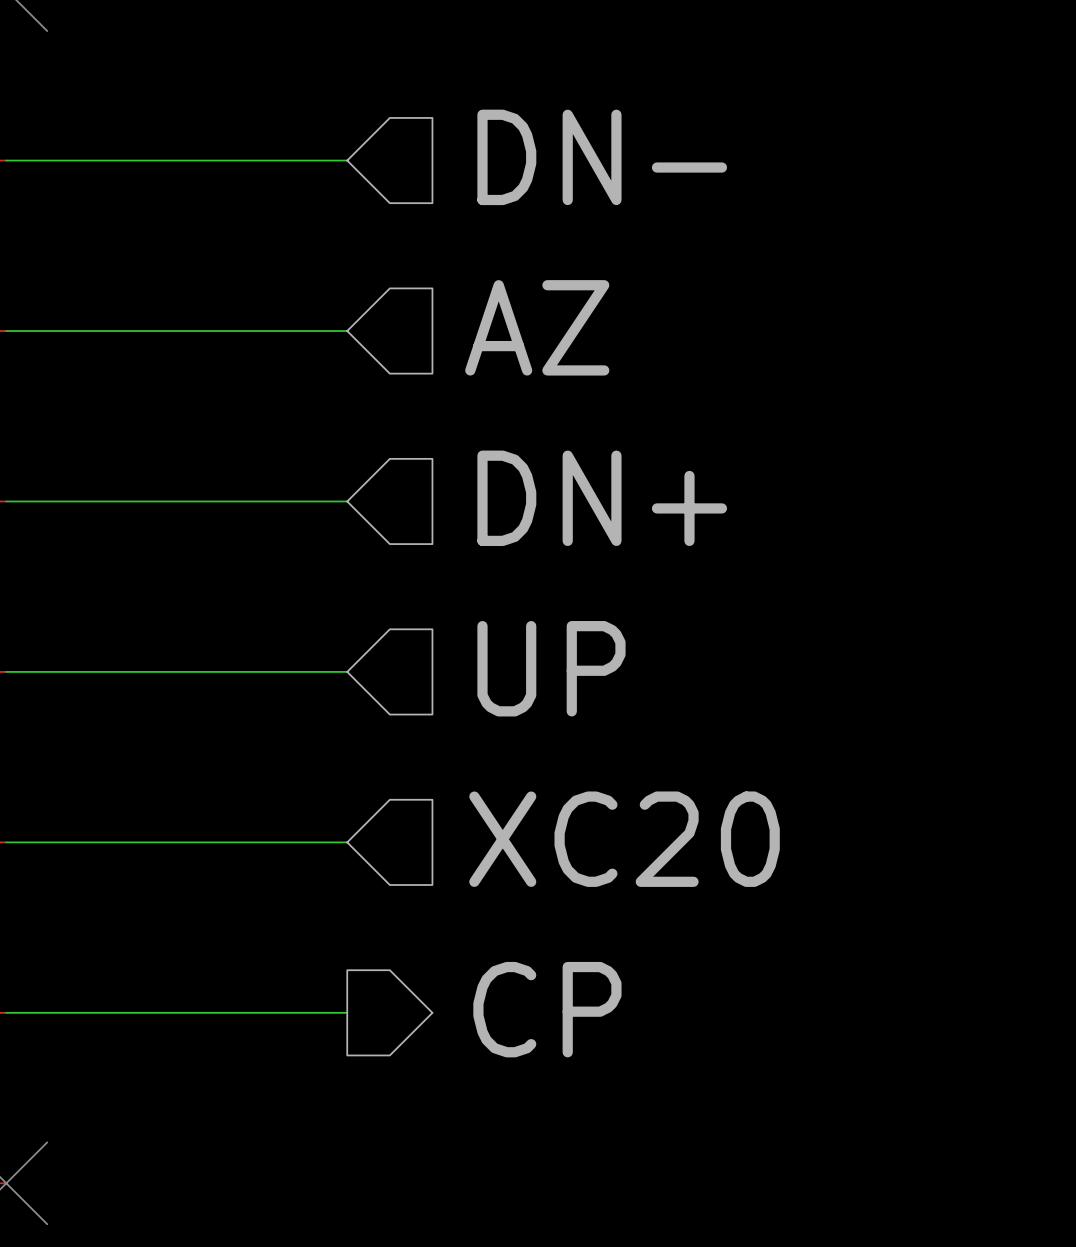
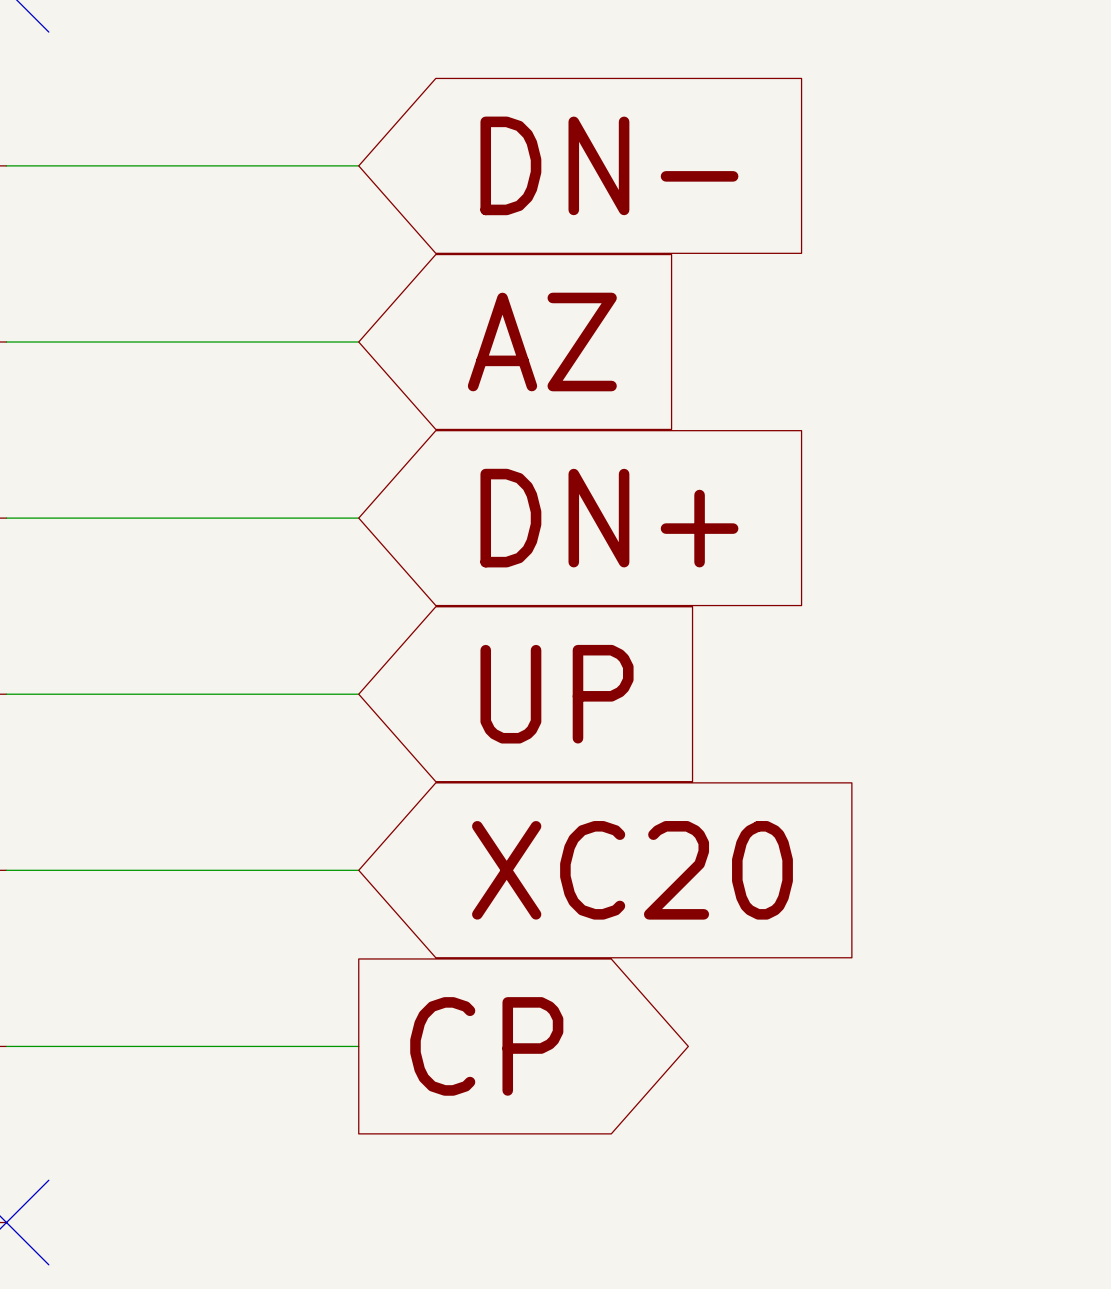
hierarchical label: DN- (602, 157) -> none
global label: none -> DN- (609, 165)
hierarchical label: AZ (537, 327) -> none
global label: none -> AZ (542, 342)
hierarchical label: DN+ (602, 498) -> none
global label: none -> DN+ (609, 518)
hierarchical label: UP (551, 668) -> none
global label: none -> UP (557, 694)
hierarchical label: XC20 (624, 839) -> none
global label: none -> XC20 (632, 870)
hierarchical label: CP (547, 1009) -> none
global label: none -> CP (486, 1046)

